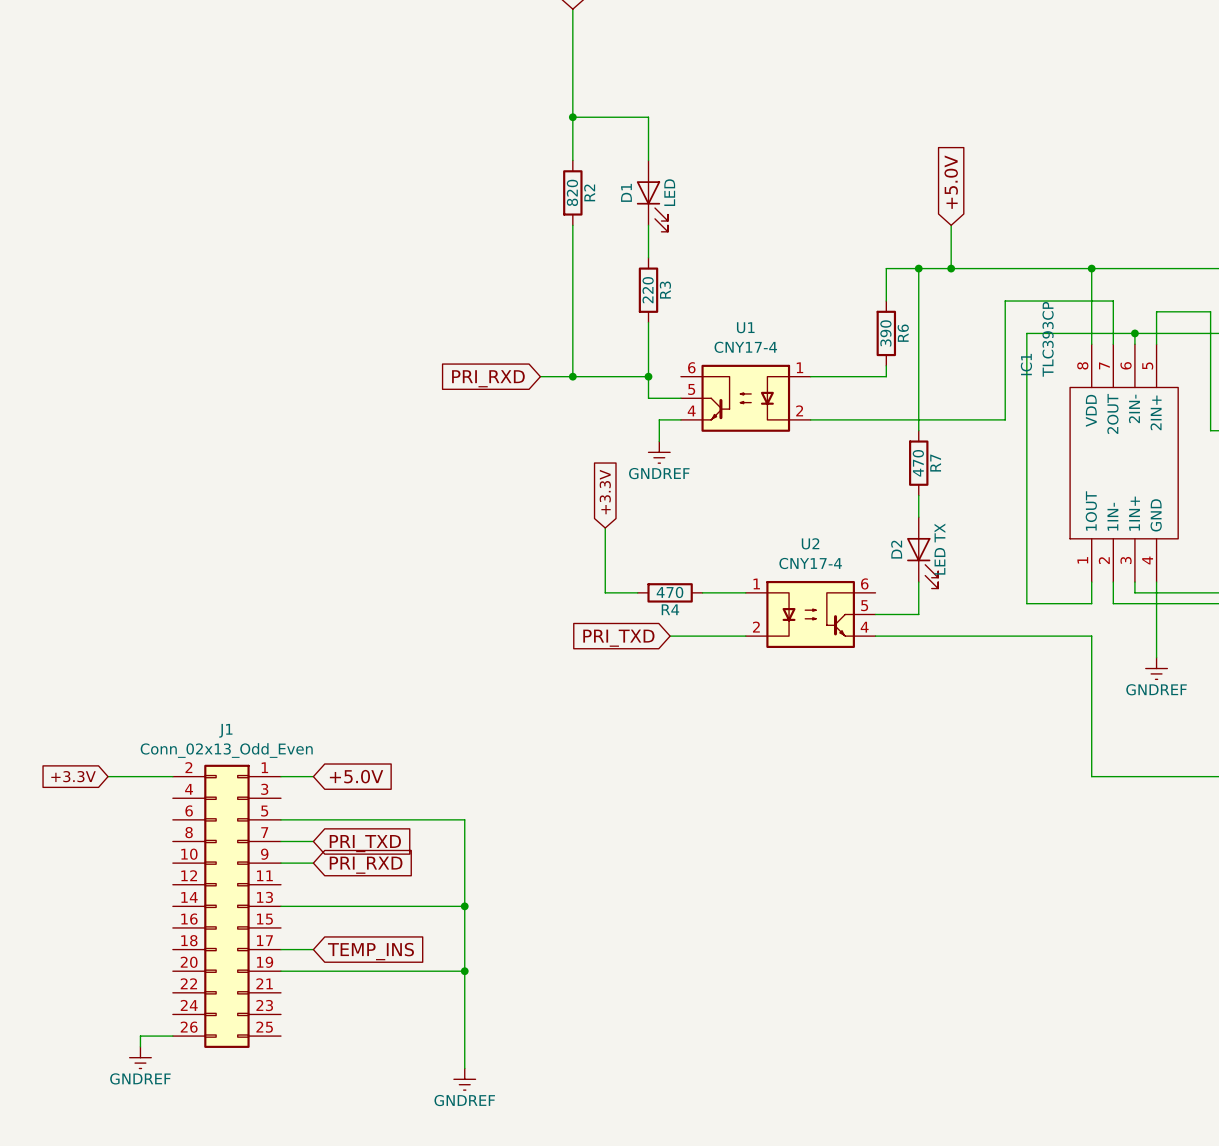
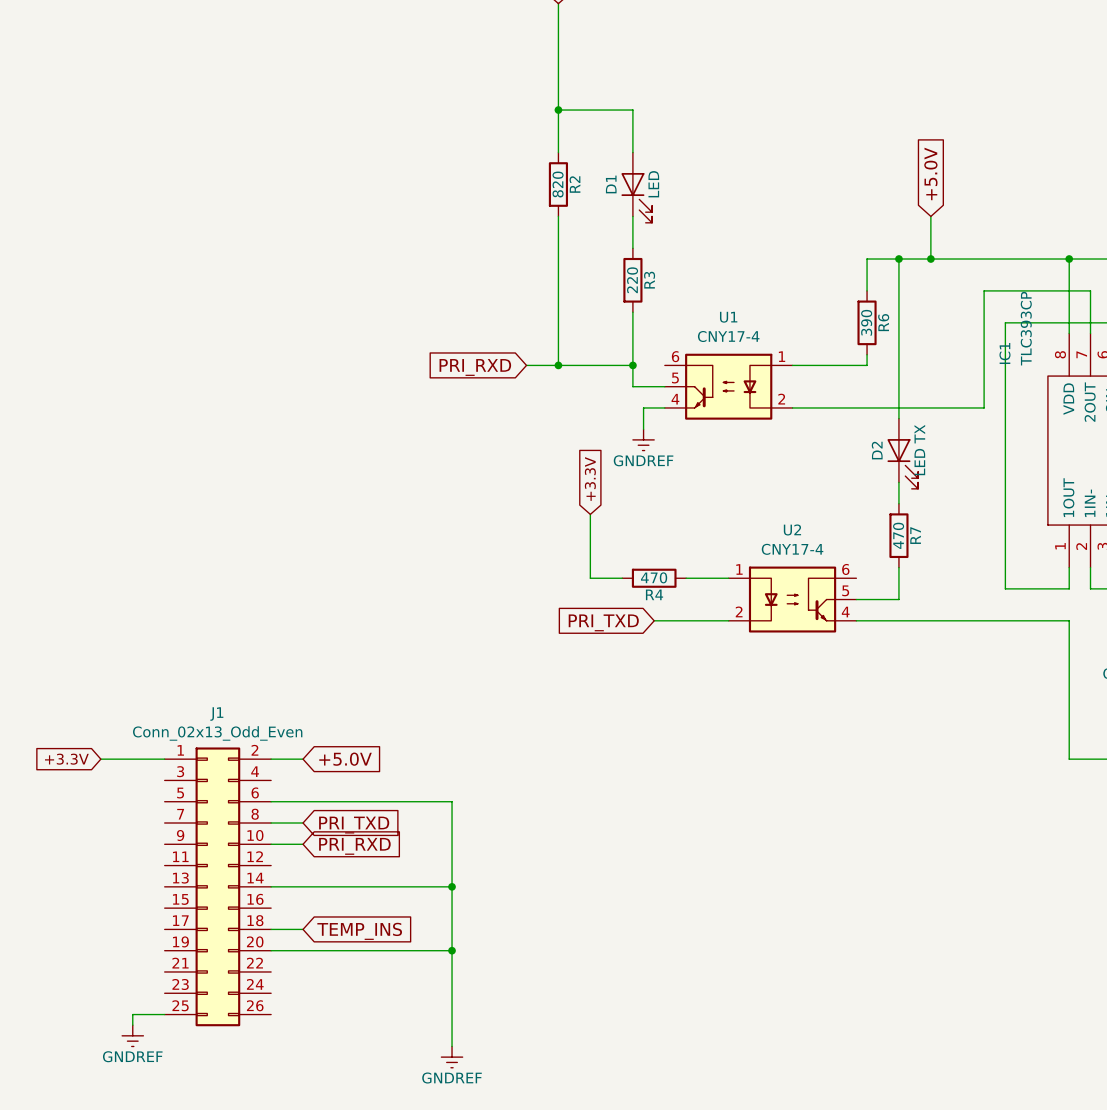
R7 position: (918, 463) -> (898, 535)
D2 position: (922, 552) -> (902, 453)
J1 flip: as is (226, 906) -> left-right (217, 886)

